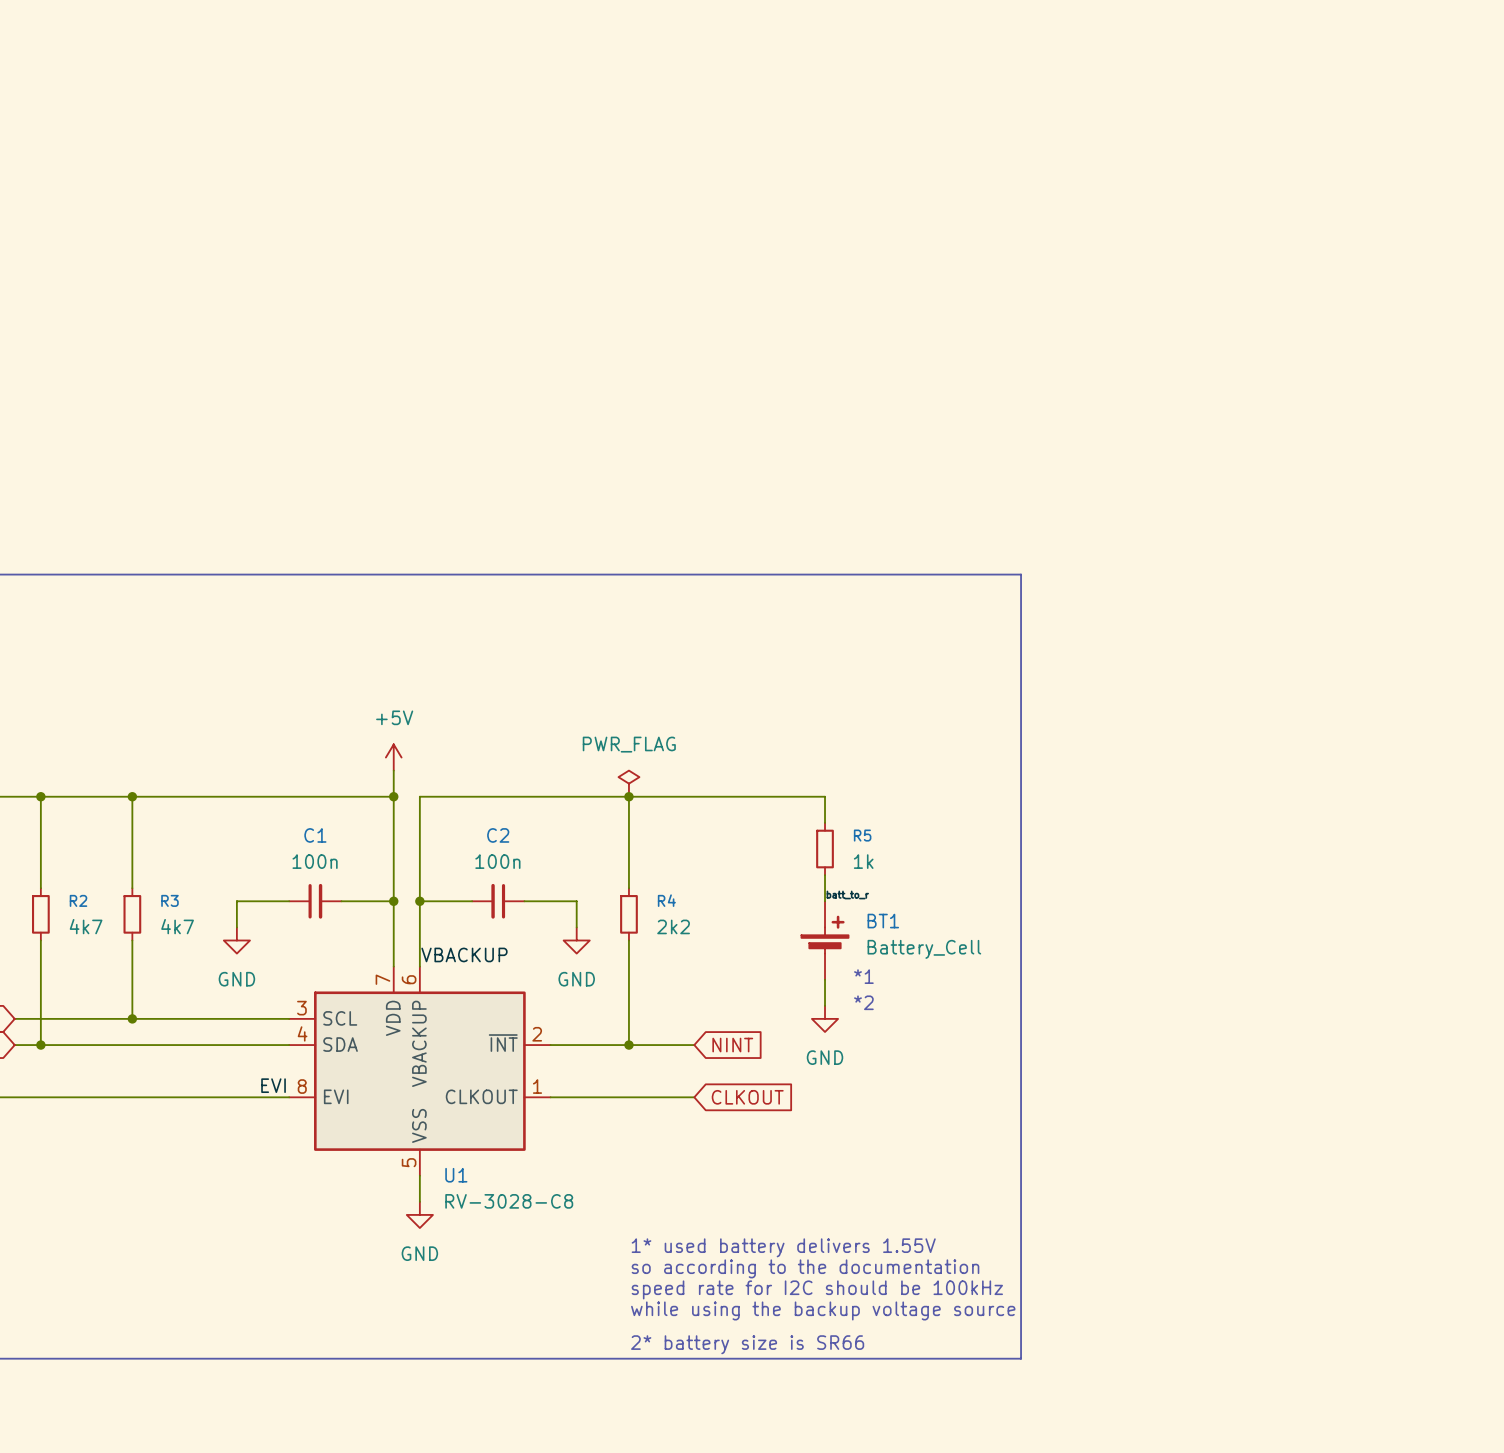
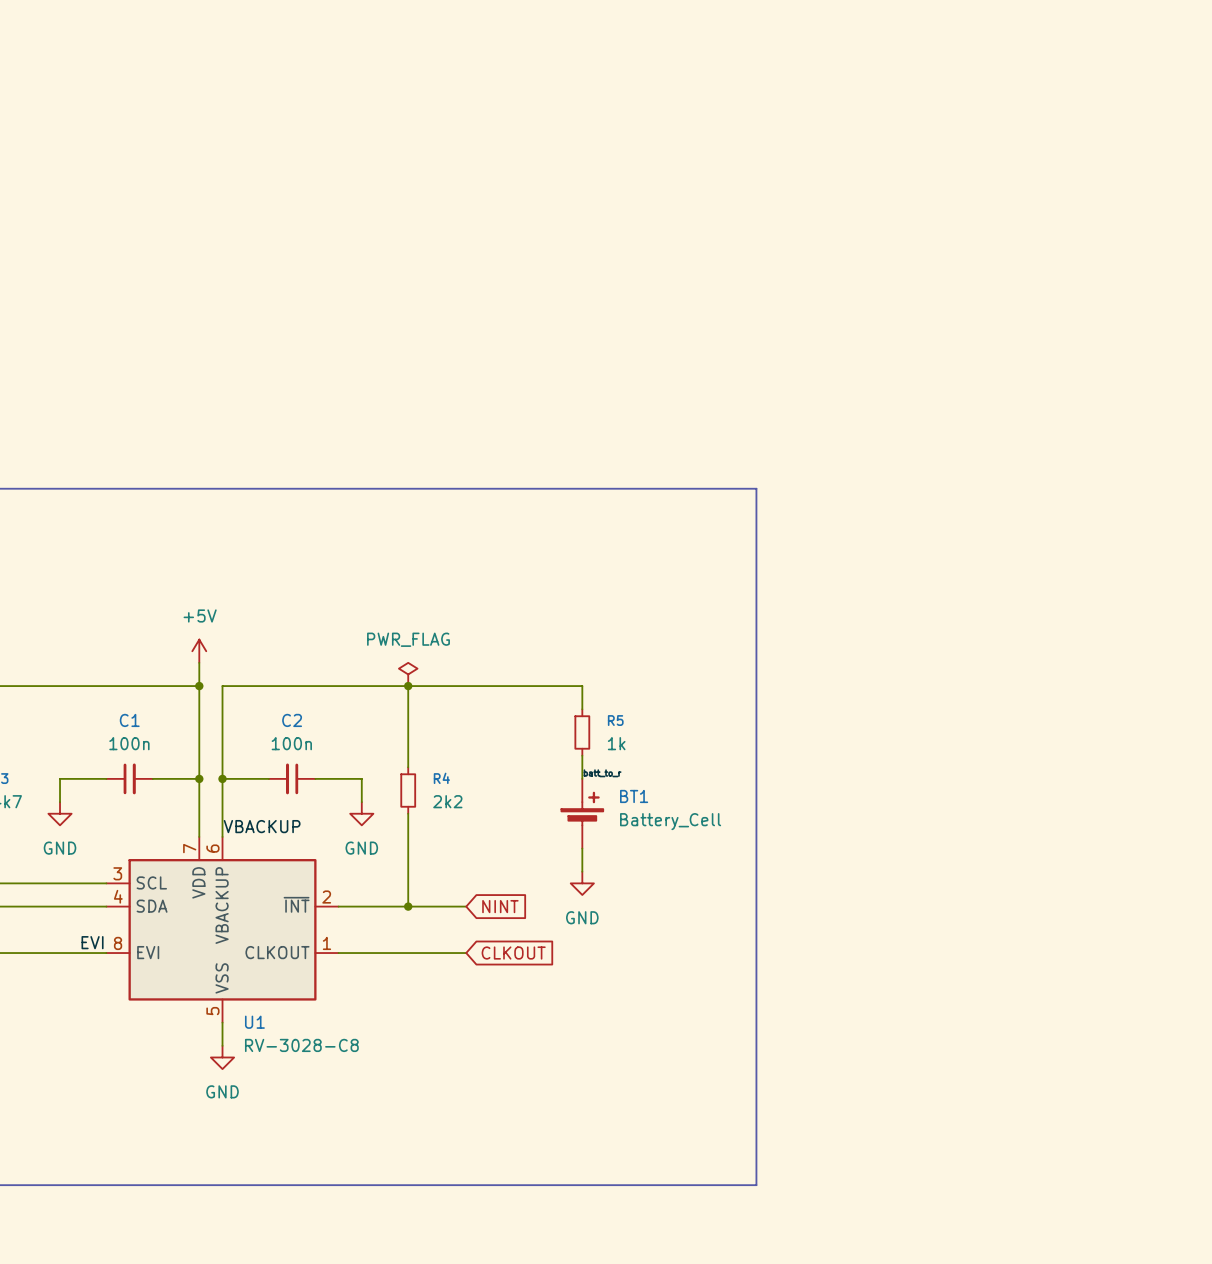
text: *1 (863, 976) -> none
text: *2 (863, 1002) -> none
text: 1* used battery delivers 1.55V (783, 1247) -> none
text: so according to the documentation (805, 1268) -> none
text: speed rate for I2C should be 100kHz (817, 1289) -> none
text: while using the backup voltage source (823, 1310) -> none
text: 2* battery size is SR66 (747, 1344) -> none

